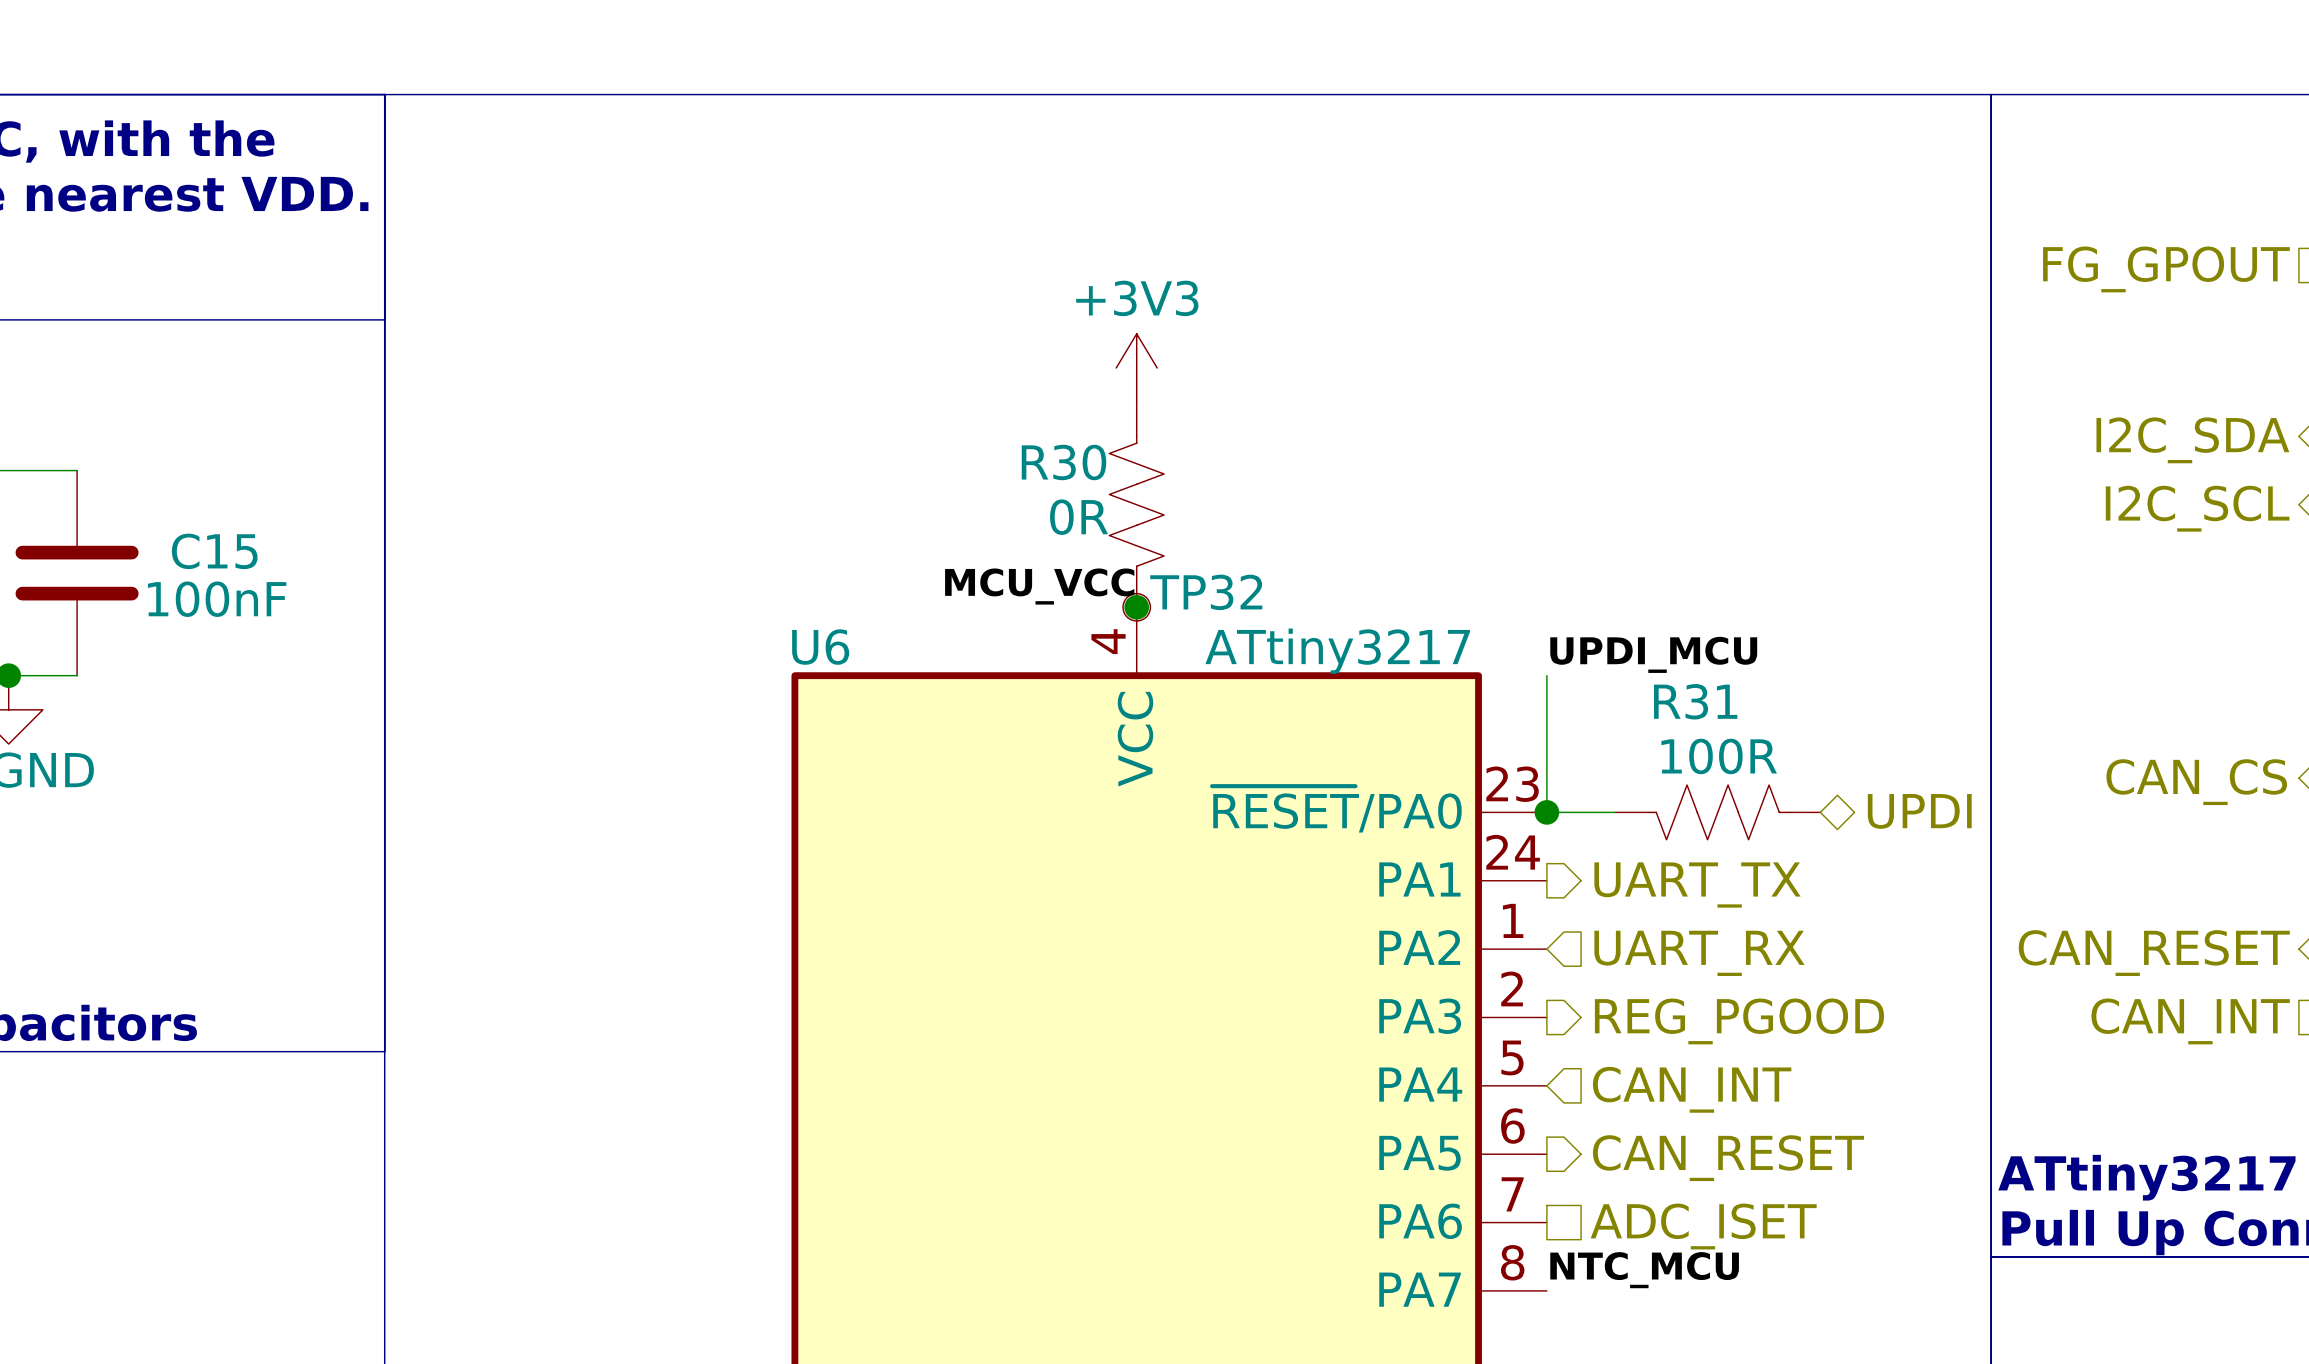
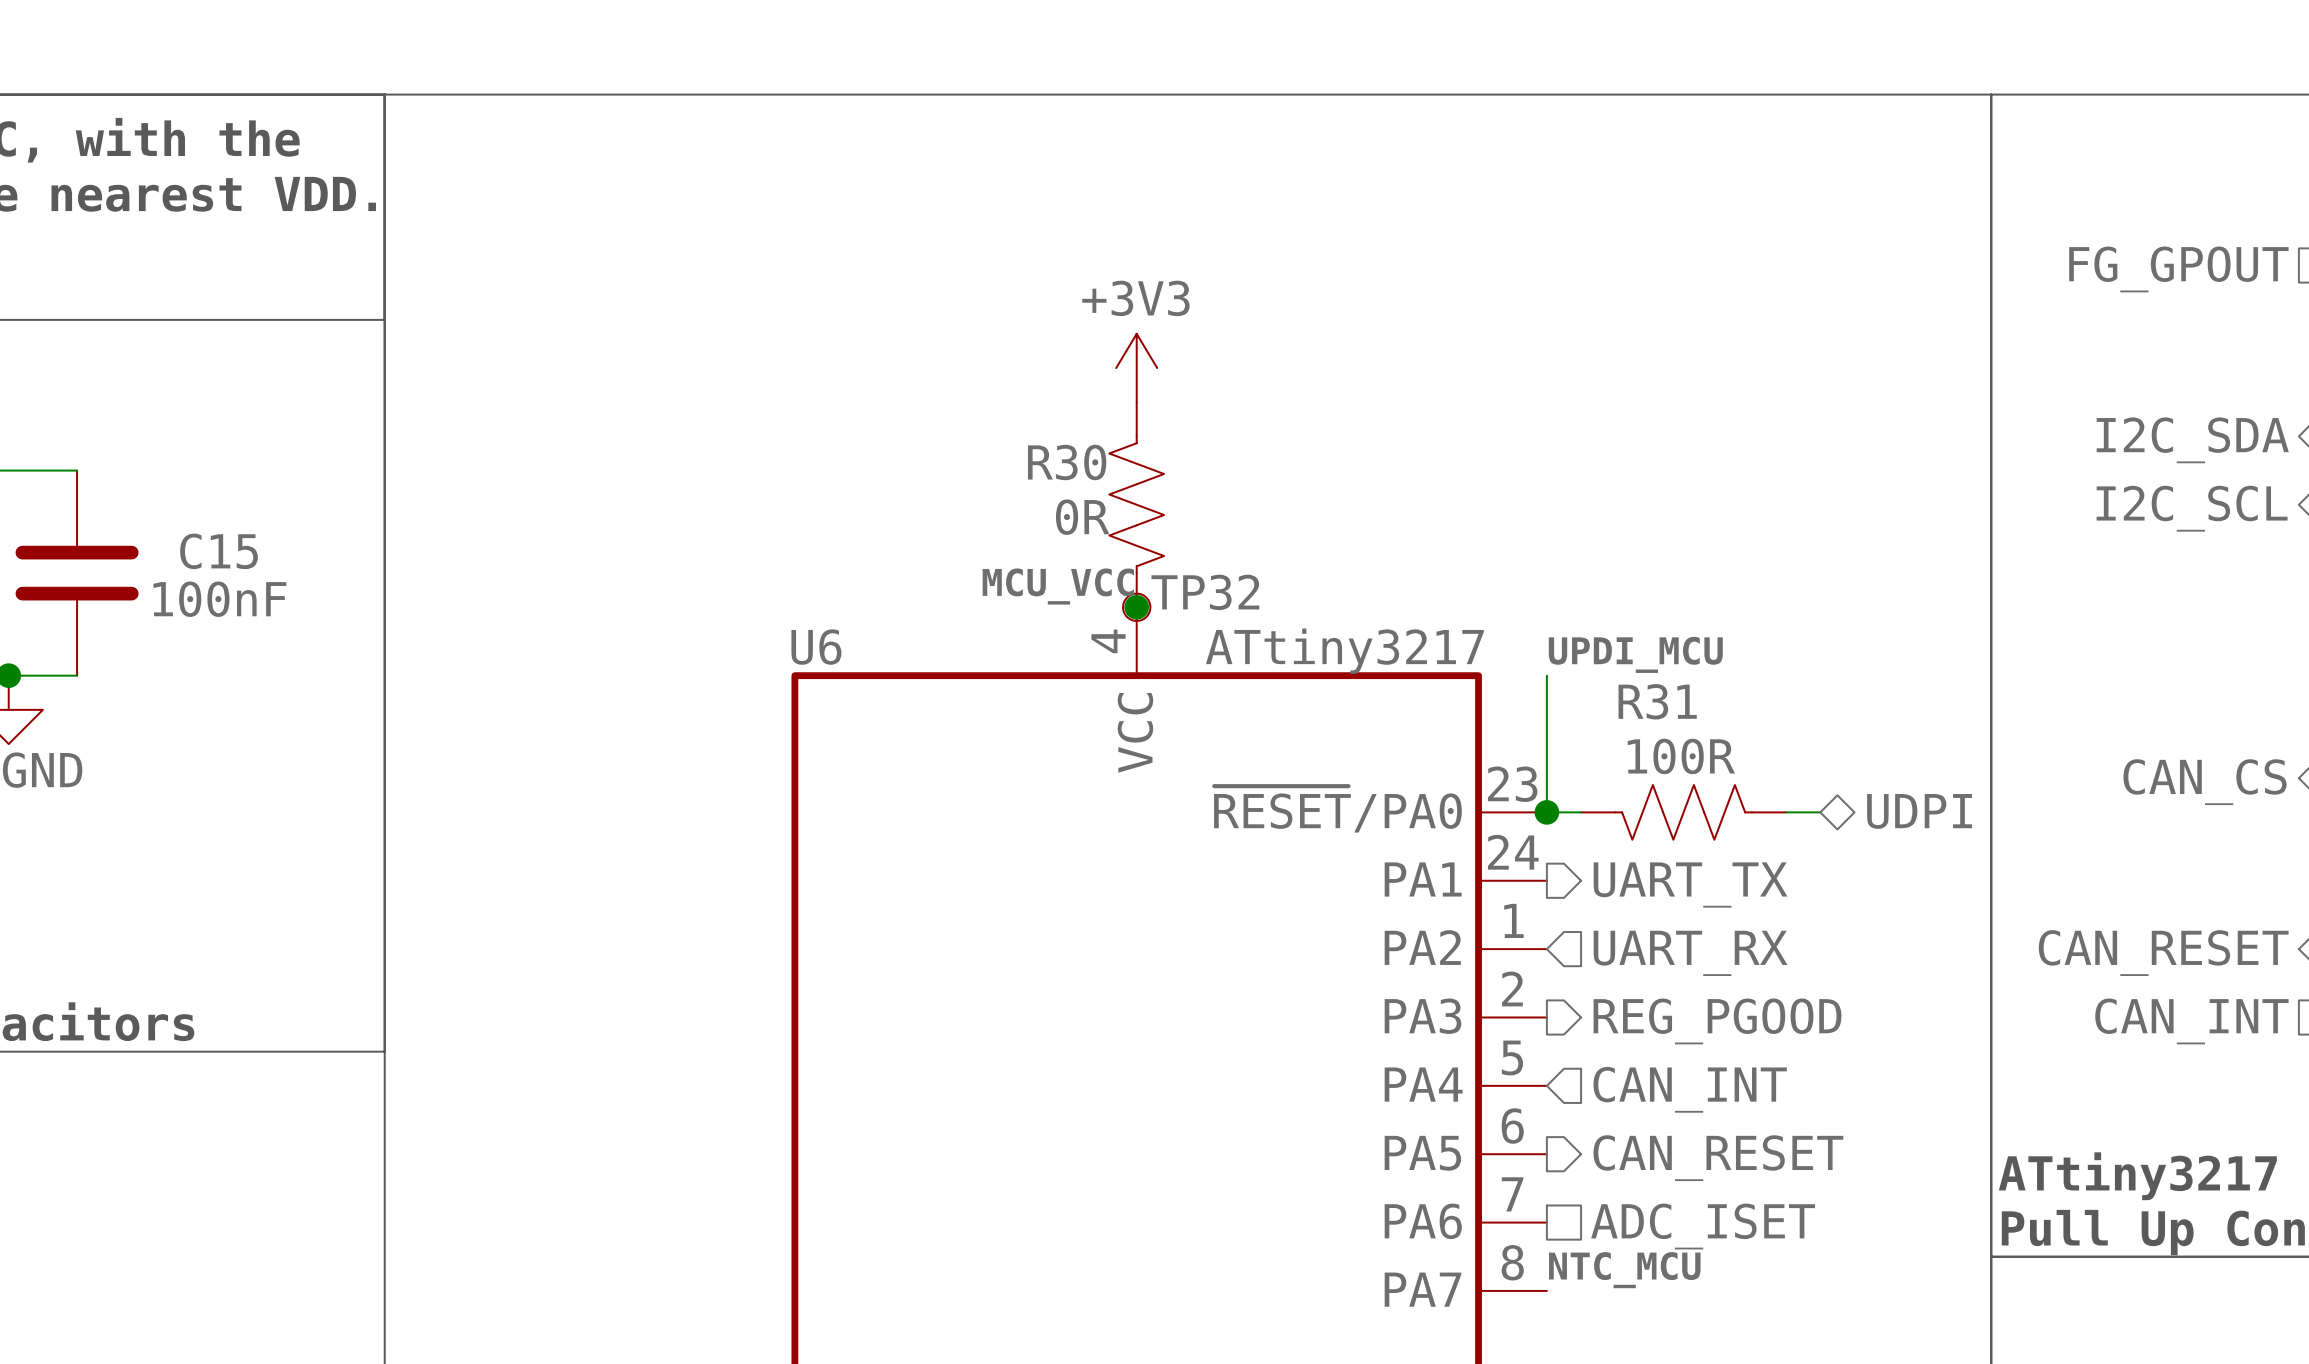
hierarchical label: UPDI (1919, 811) -> UDPI (1919, 811)
R31 position: (1717, 812) -> (1683, 812)

